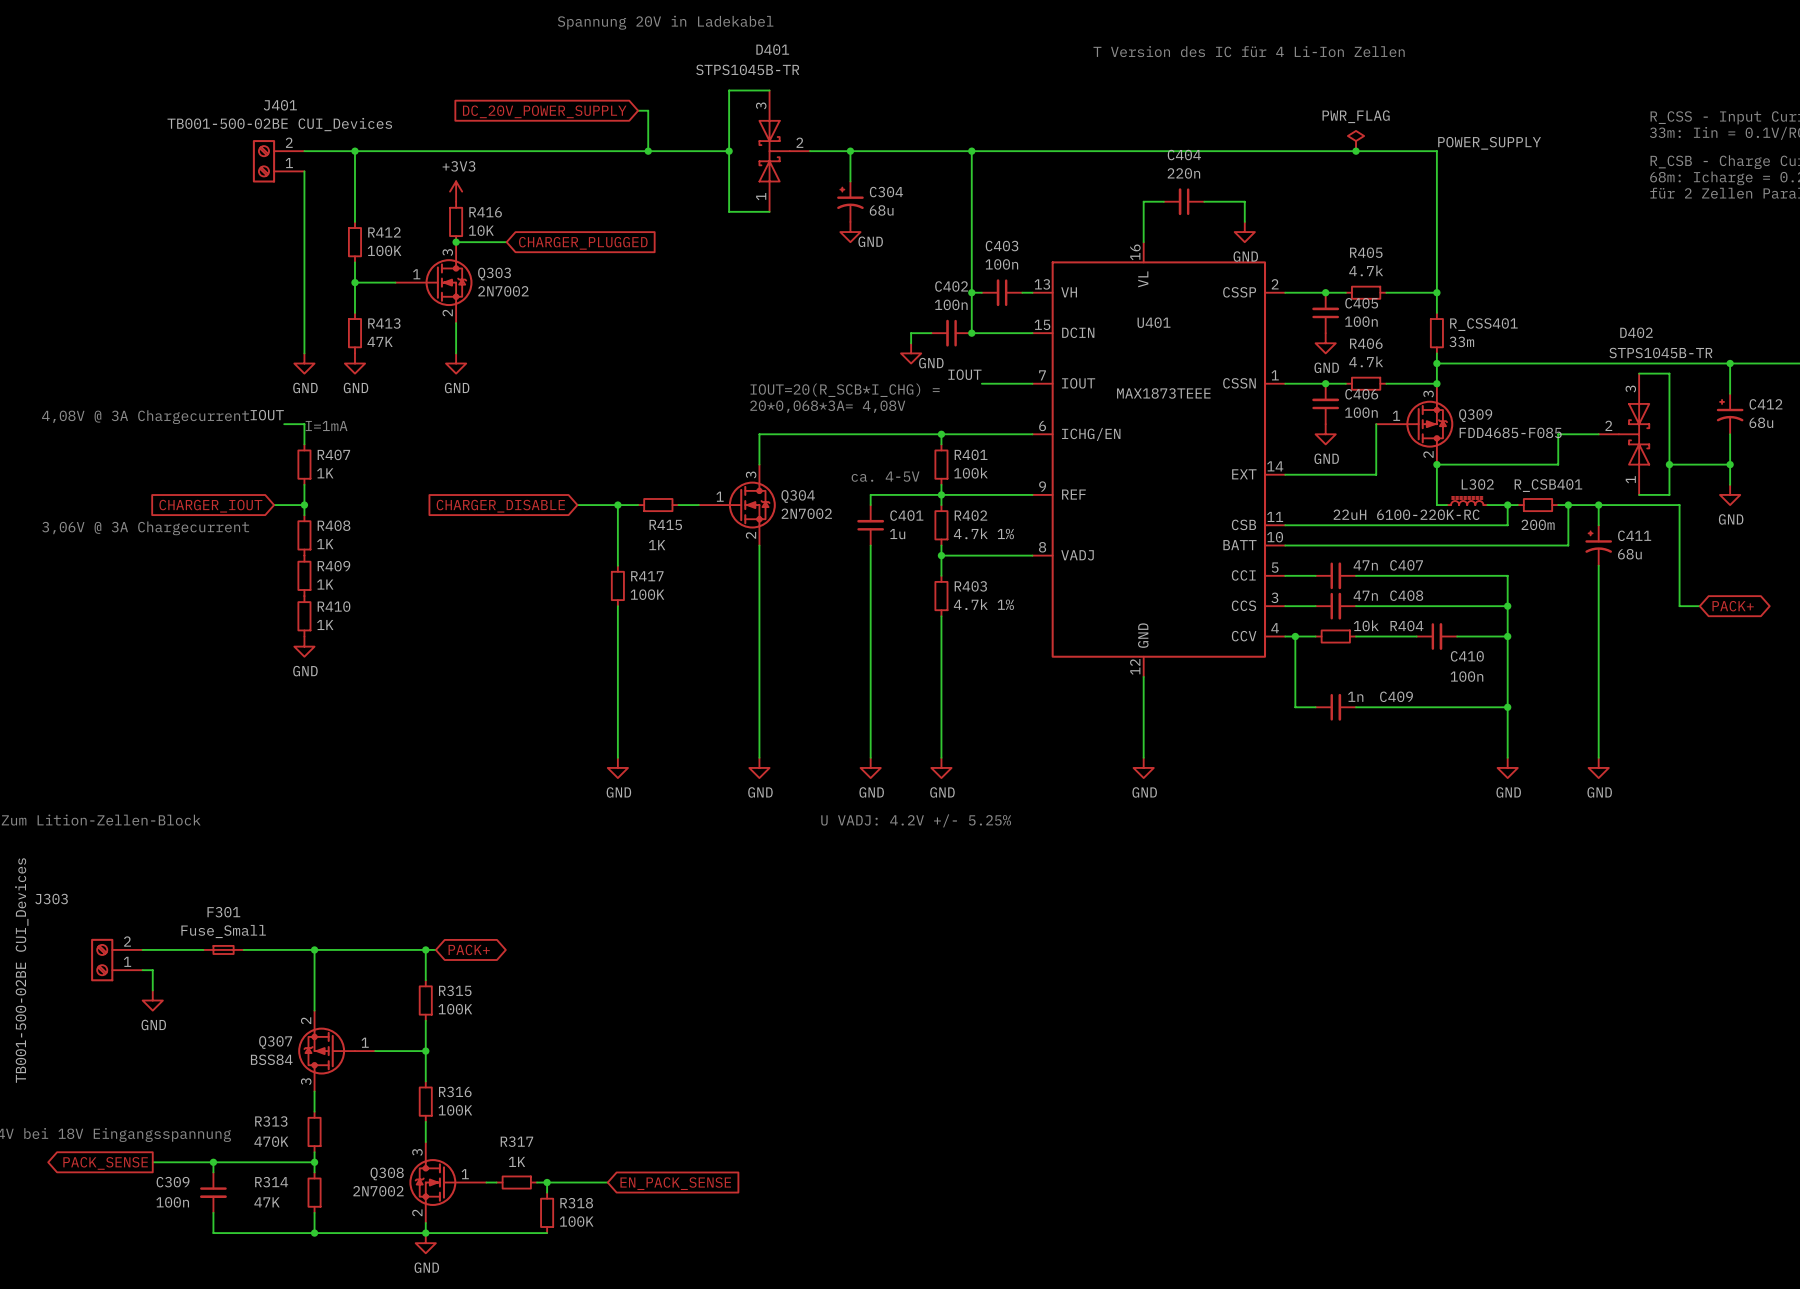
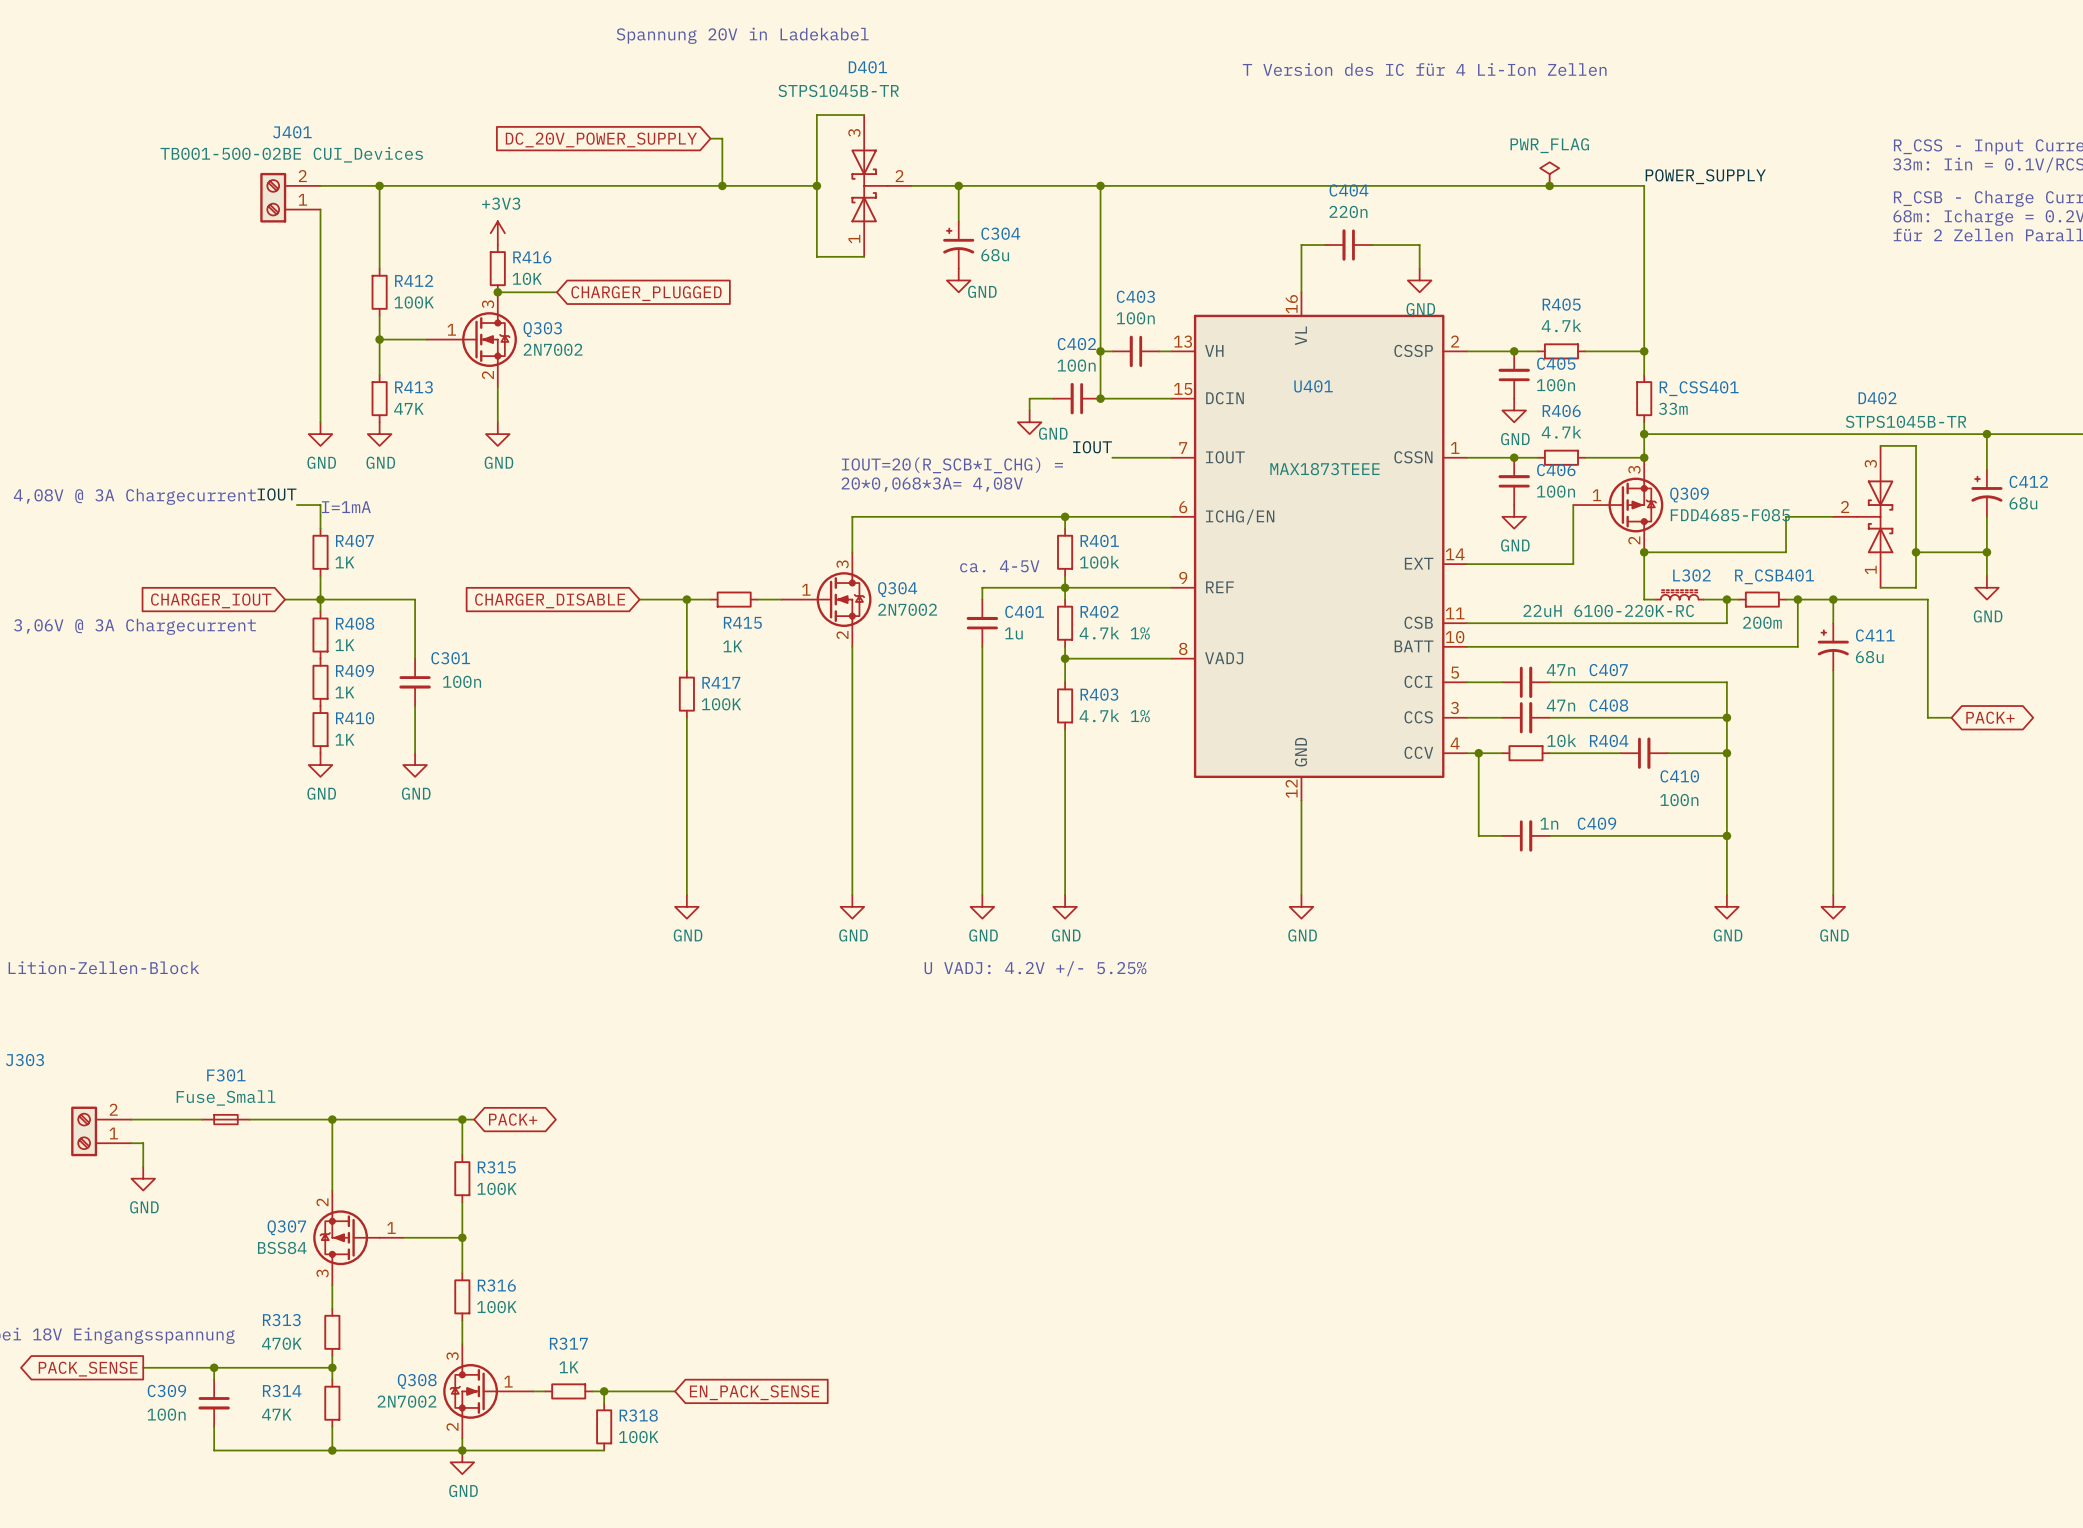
wire: none -> (320, 599) (415, 599) (415, 658)
C301: none -> 100n (415, 682)
wire: none -> (415, 705) (415, 753)
power symbol: none -> GND (415, 765)

